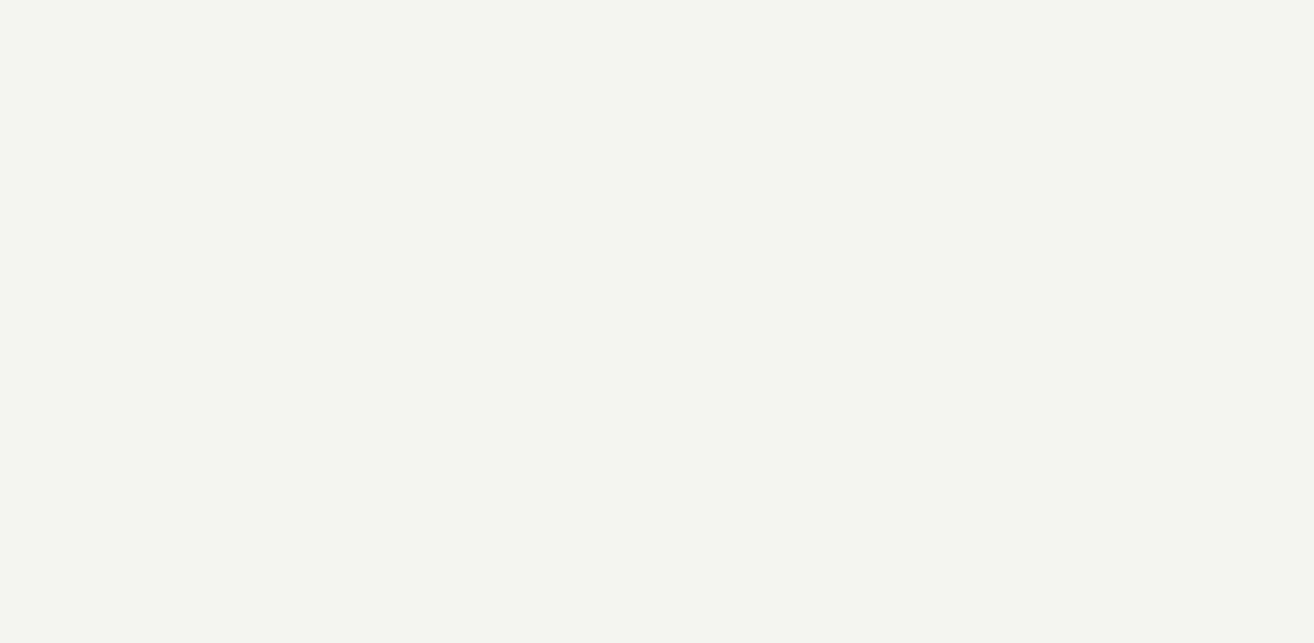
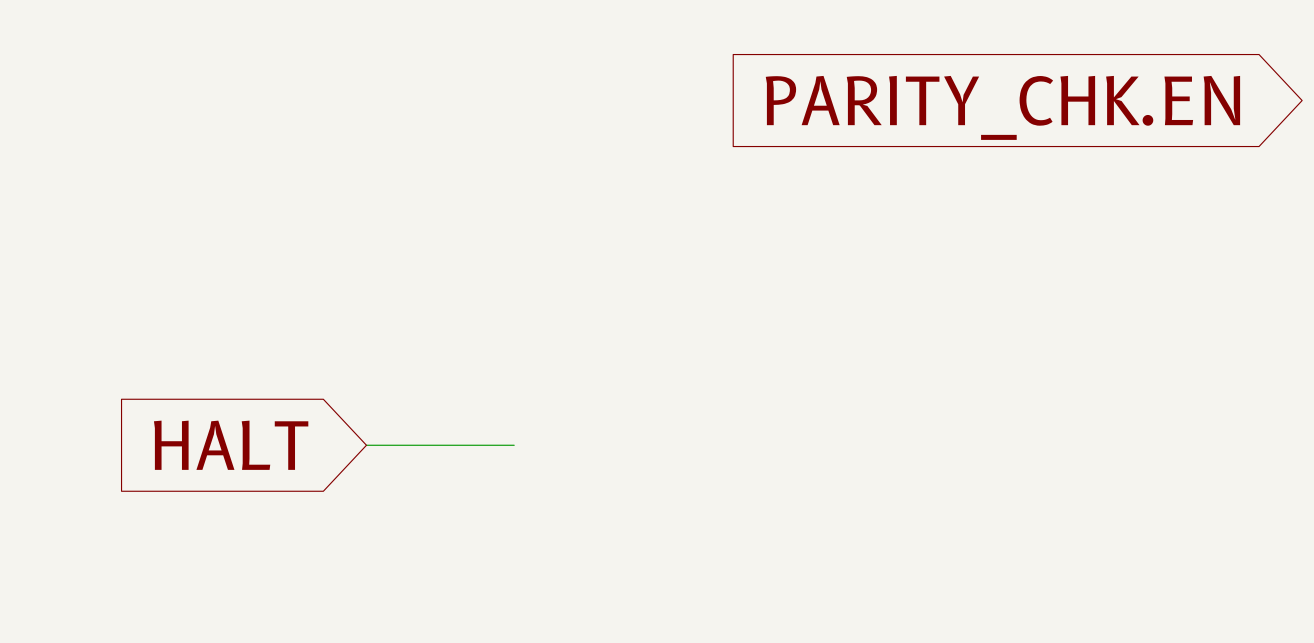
global label: none -> PARITY_CHK.EN (1002, 107)
global label: none -> HALT (231, 445)
wire: none -> (366, 445) (514, 445)

